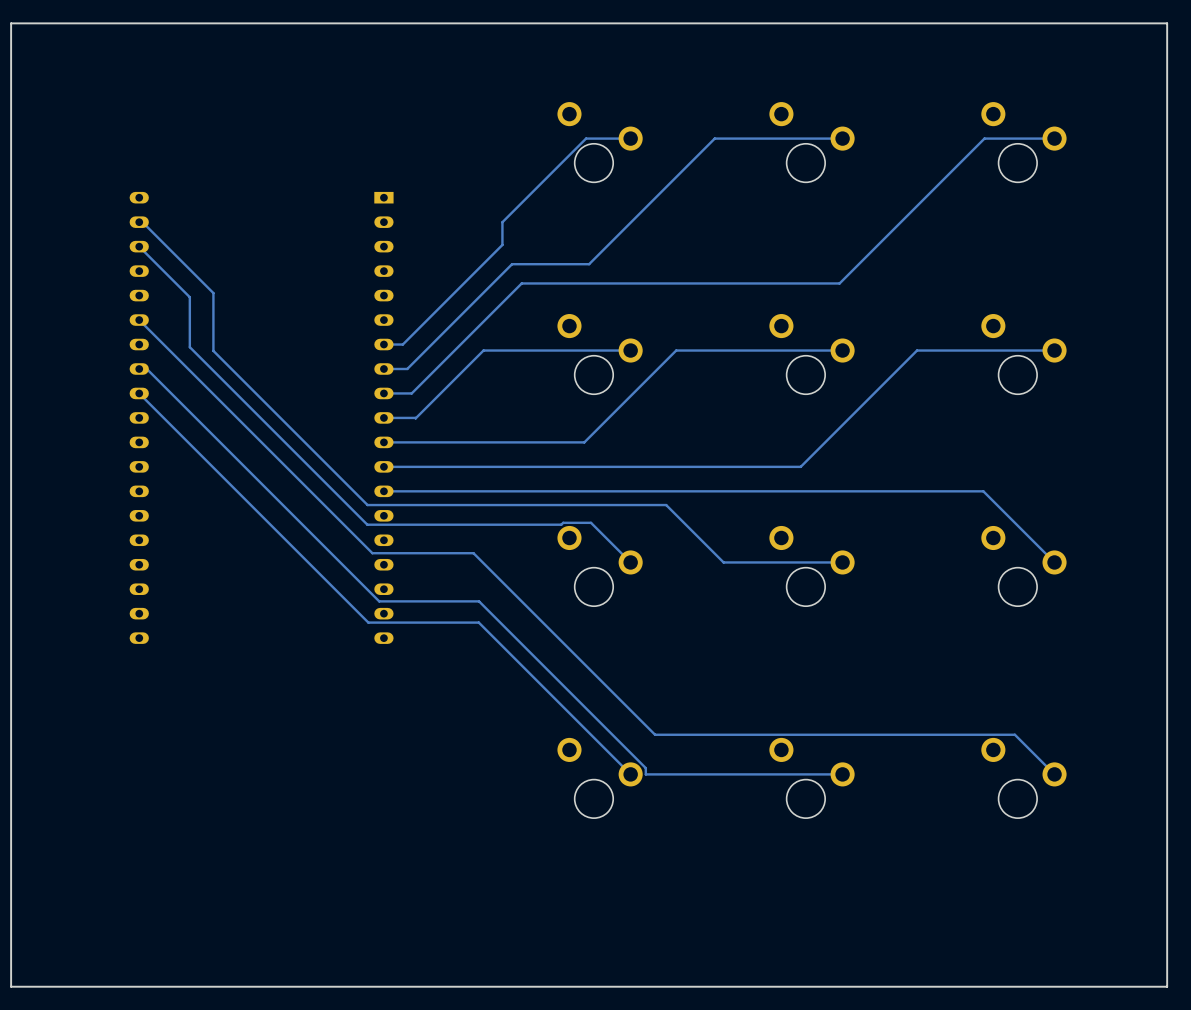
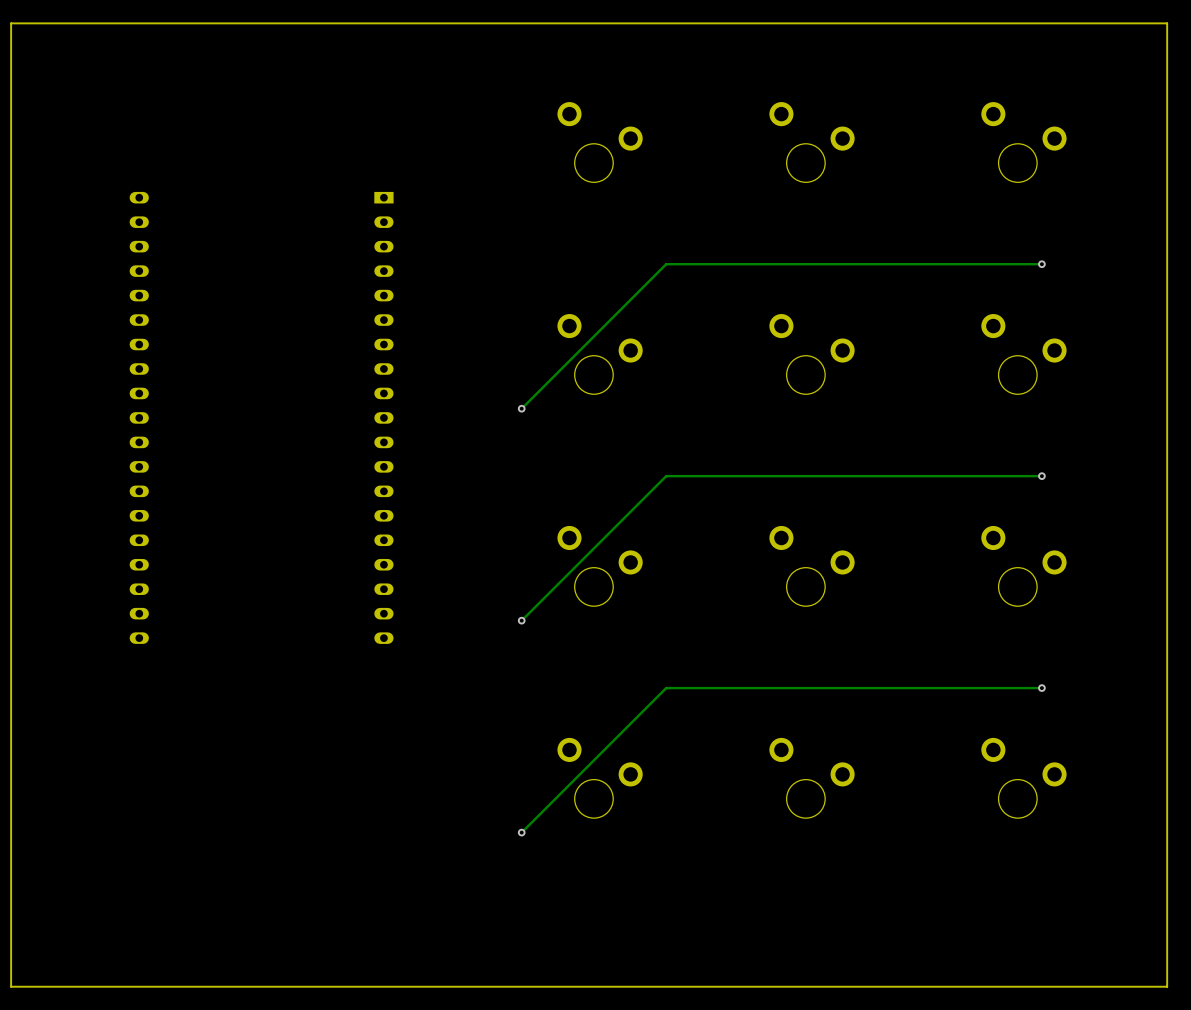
track: (630, 138) (586, 138) (502, 222) (502, 244) (402, 344) (383, 344) -> none
track: (842, 138) (714, 138) (589, 264) (512, 264) (407, 368) (383, 368) -> none
track: (1054, 138) (984, 138) (839, 283) (521, 283) (411, 393) (383, 393) -> none
track: (139, 222) (142, 222) (213, 293) (213, 350) (367, 505) (666, 505) (723, 562) (842, 562) -> none
track: (139, 246) (189, 297) (189, 347) (367, 524) (561, 524) (563, 522) (591, 522) (630, 562) -> none
track: none -> (1041, 264) (666, 264) (521, 408)
via: none -> (1041, 264)
track: (139, 320) (372, 553) (473, 553) (655, 734) (1014, 734) (1054, 774) -> none
track: (630, 350) (483, 350) (415, 418) (383, 417) -> none
track: (842, 350) (676, 350) (584, 442) (383, 442) -> none
track: (1054, 350) (917, 350) (800, 466) (383, 466) -> none
track: (139, 368) (146, 368) (379, 601) (479, 601) (645, 768) (645, 774) (842, 774) -> none
track: (139, 393) (368, 622) (478, 622) (630, 774) -> none
via: none -> (521, 408)
track: none -> (1041, 476) (666, 476) (521, 620)
via: none -> (1041, 476)
track: (383, 491) (983, 491) (1054, 562) -> none
via: none -> (521, 620)
track: none -> (1041, 688) (666, 688) (521, 832)
via: none -> (1041, 688)
via: none -> (521, 832)

